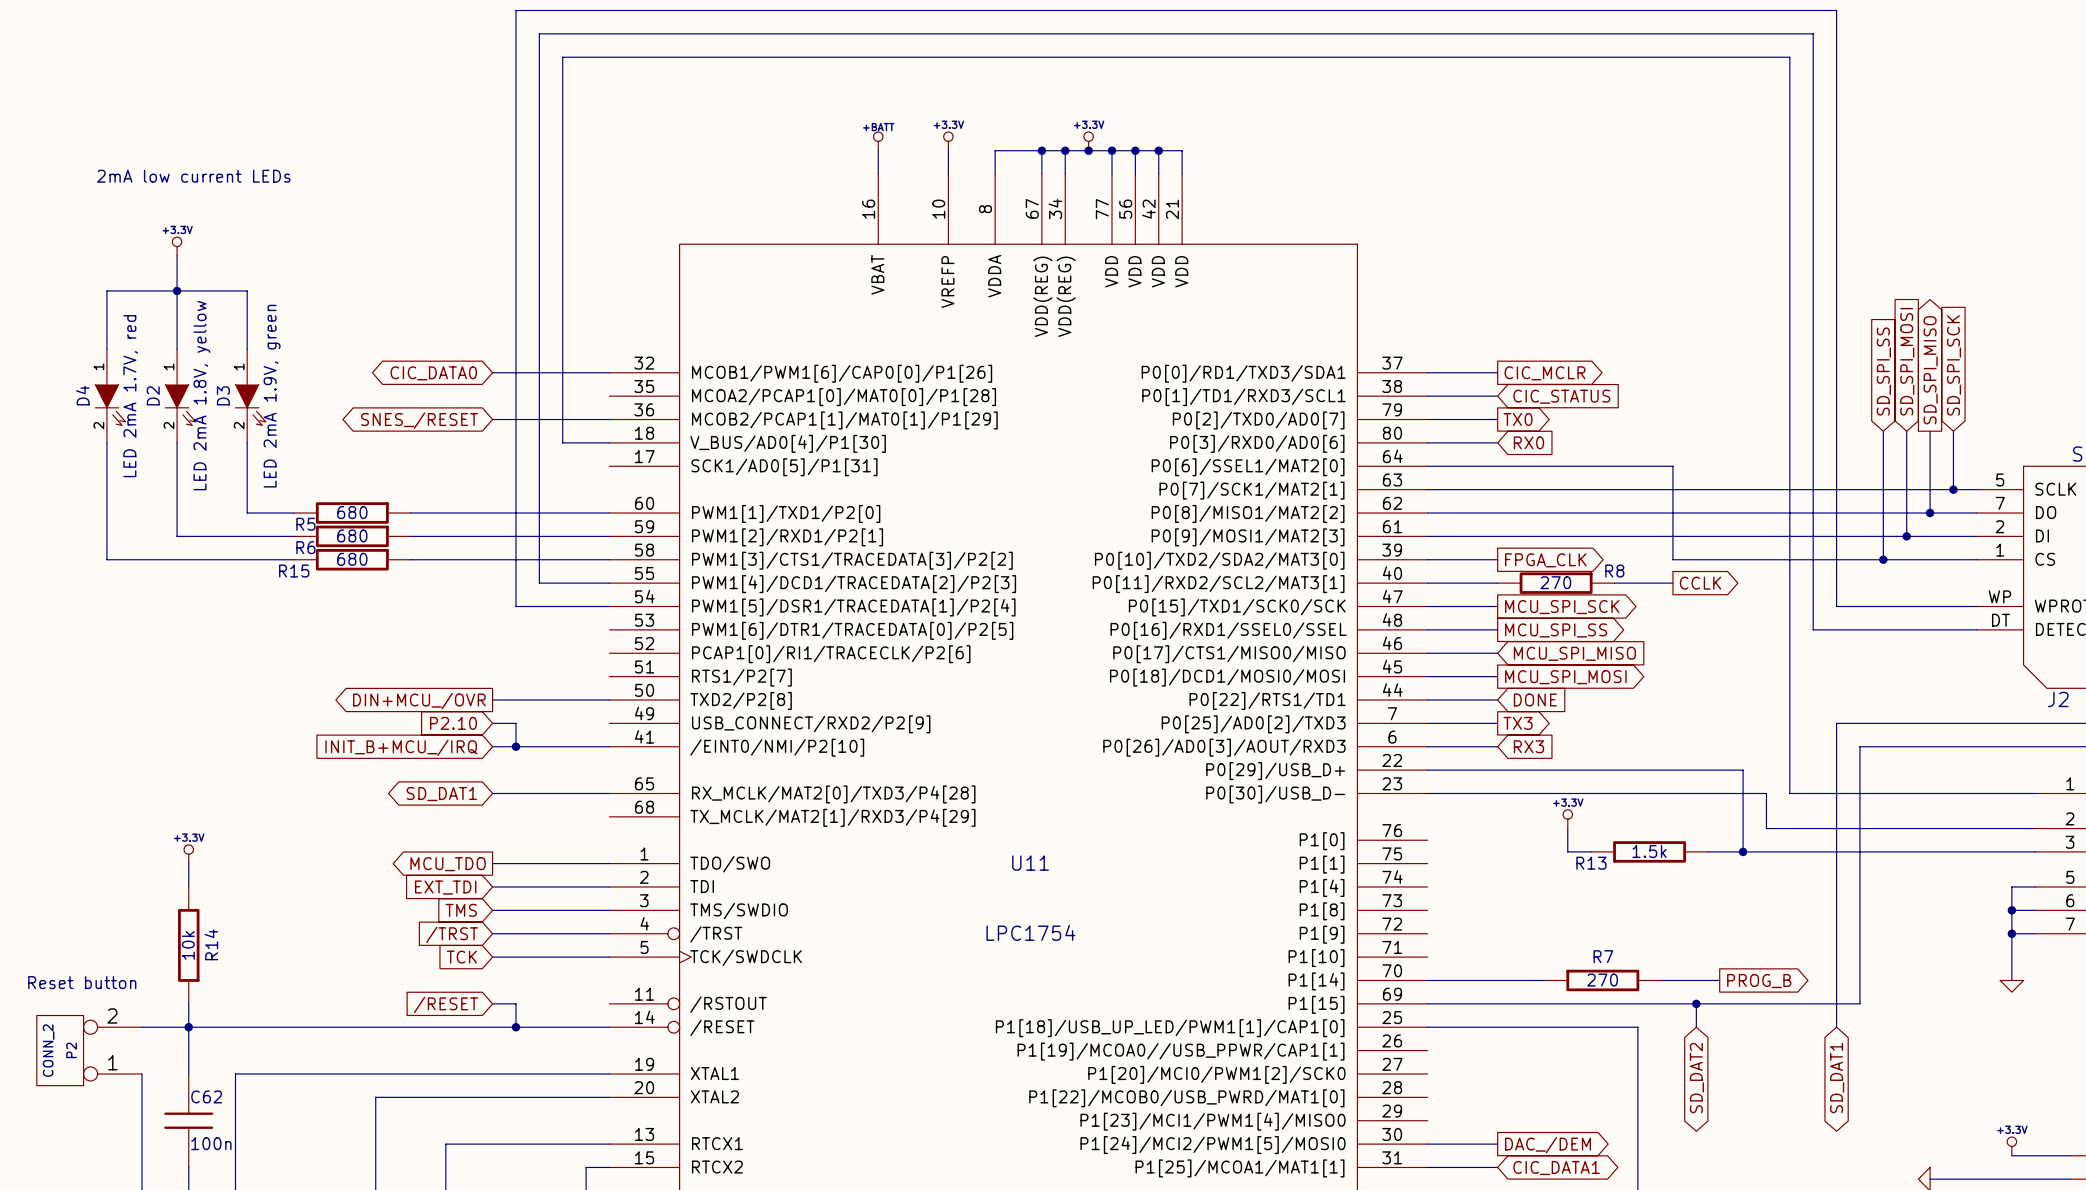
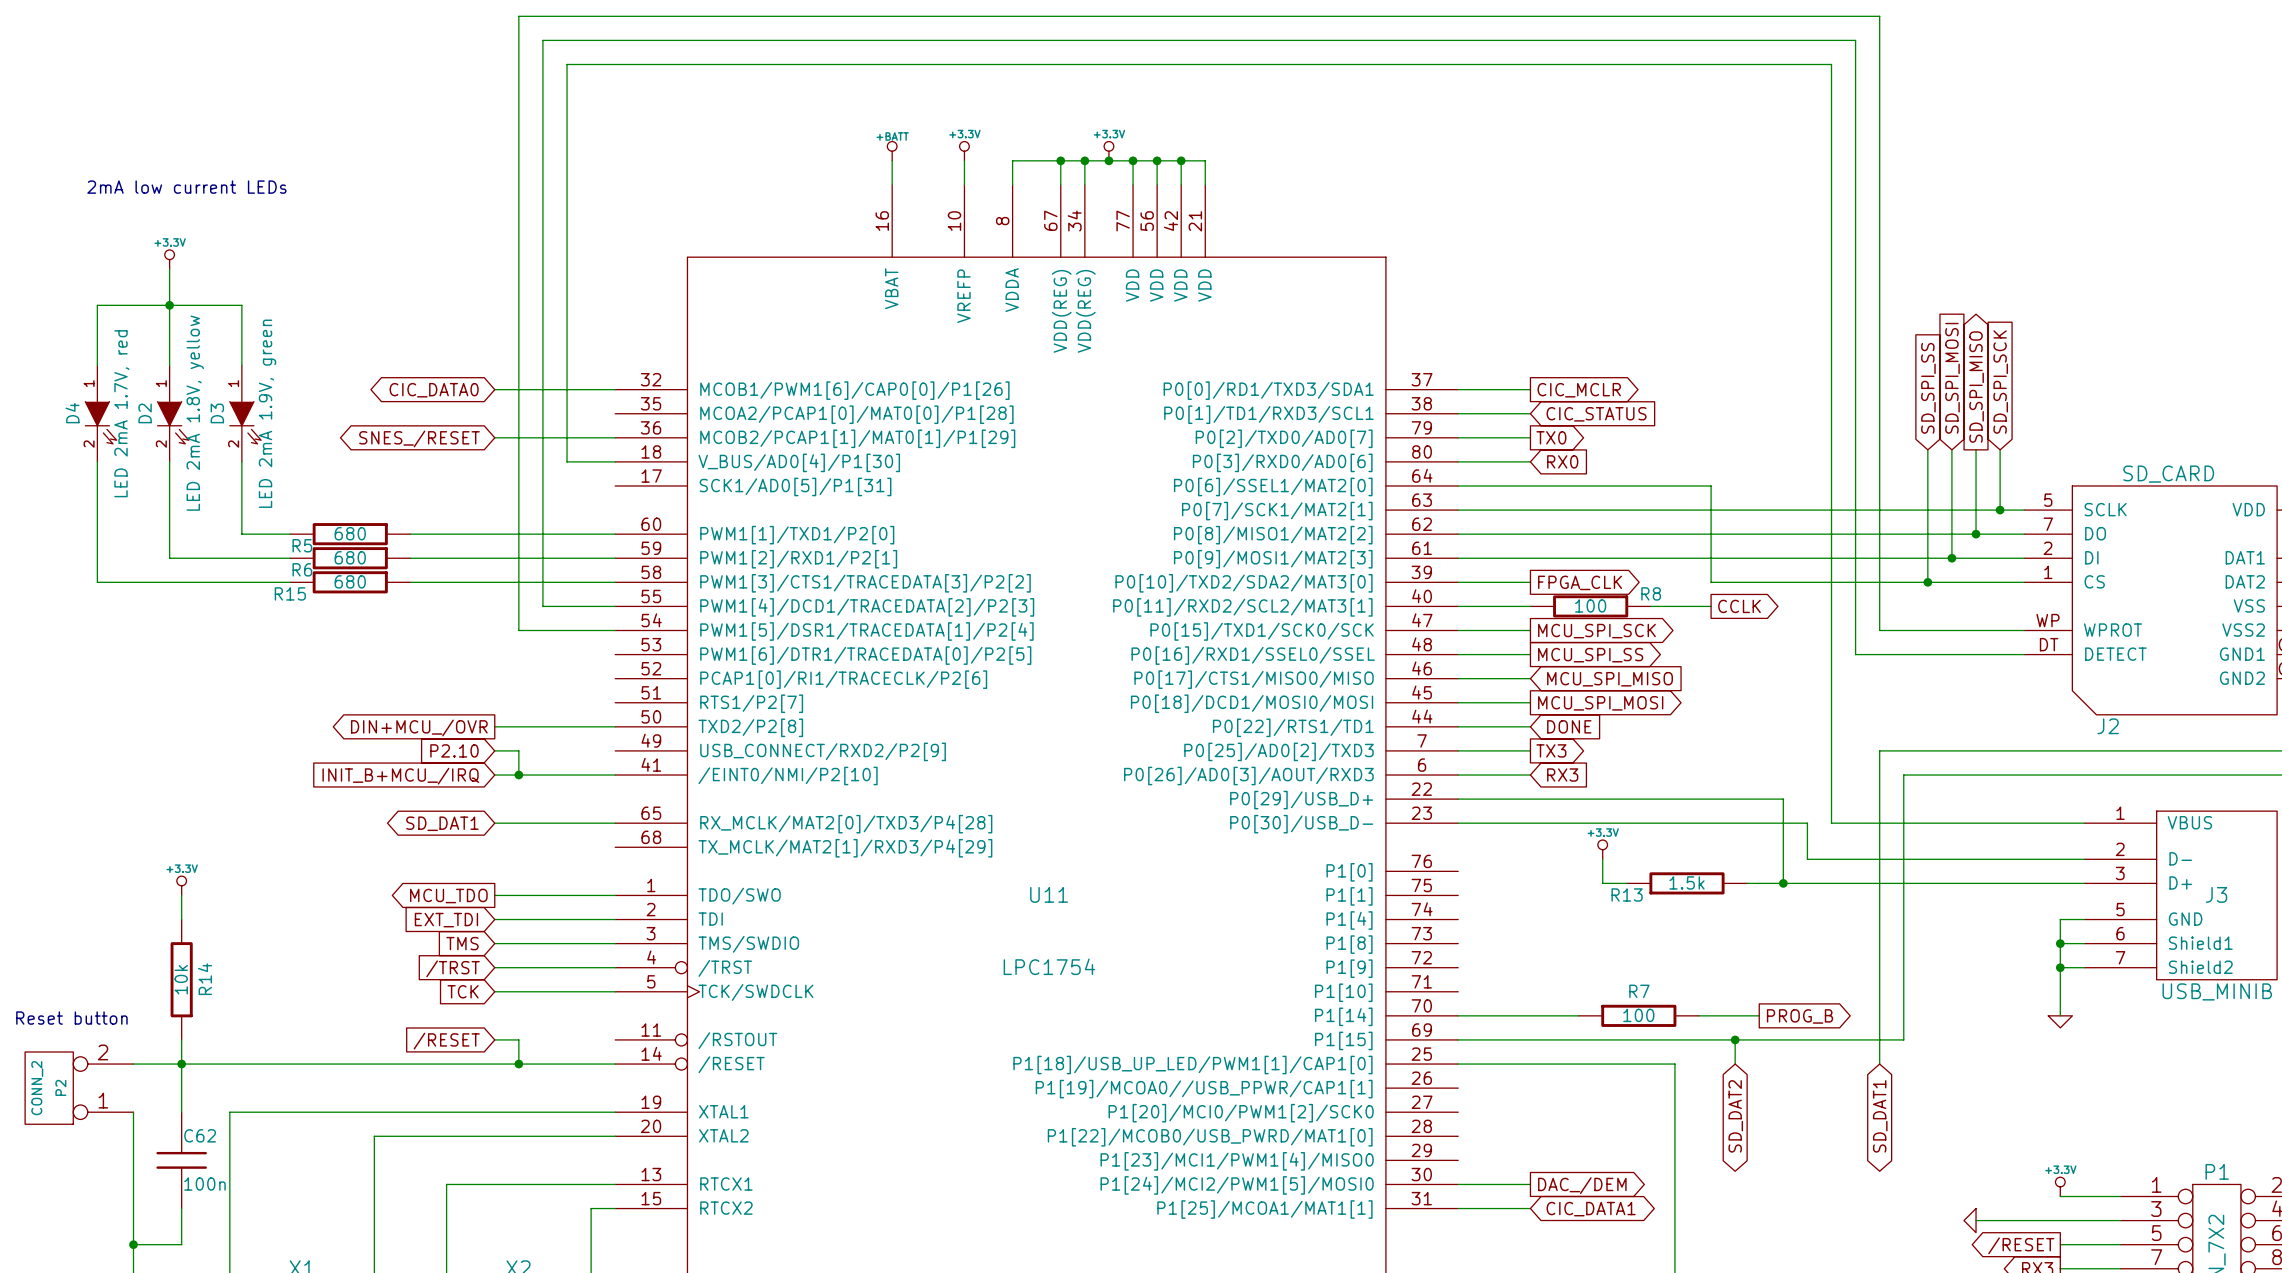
R8 value: 270 (1555, 582) -> 100 (1590, 605)
R7 value: 270 (1602, 980) -> 100 (1638, 1015)

